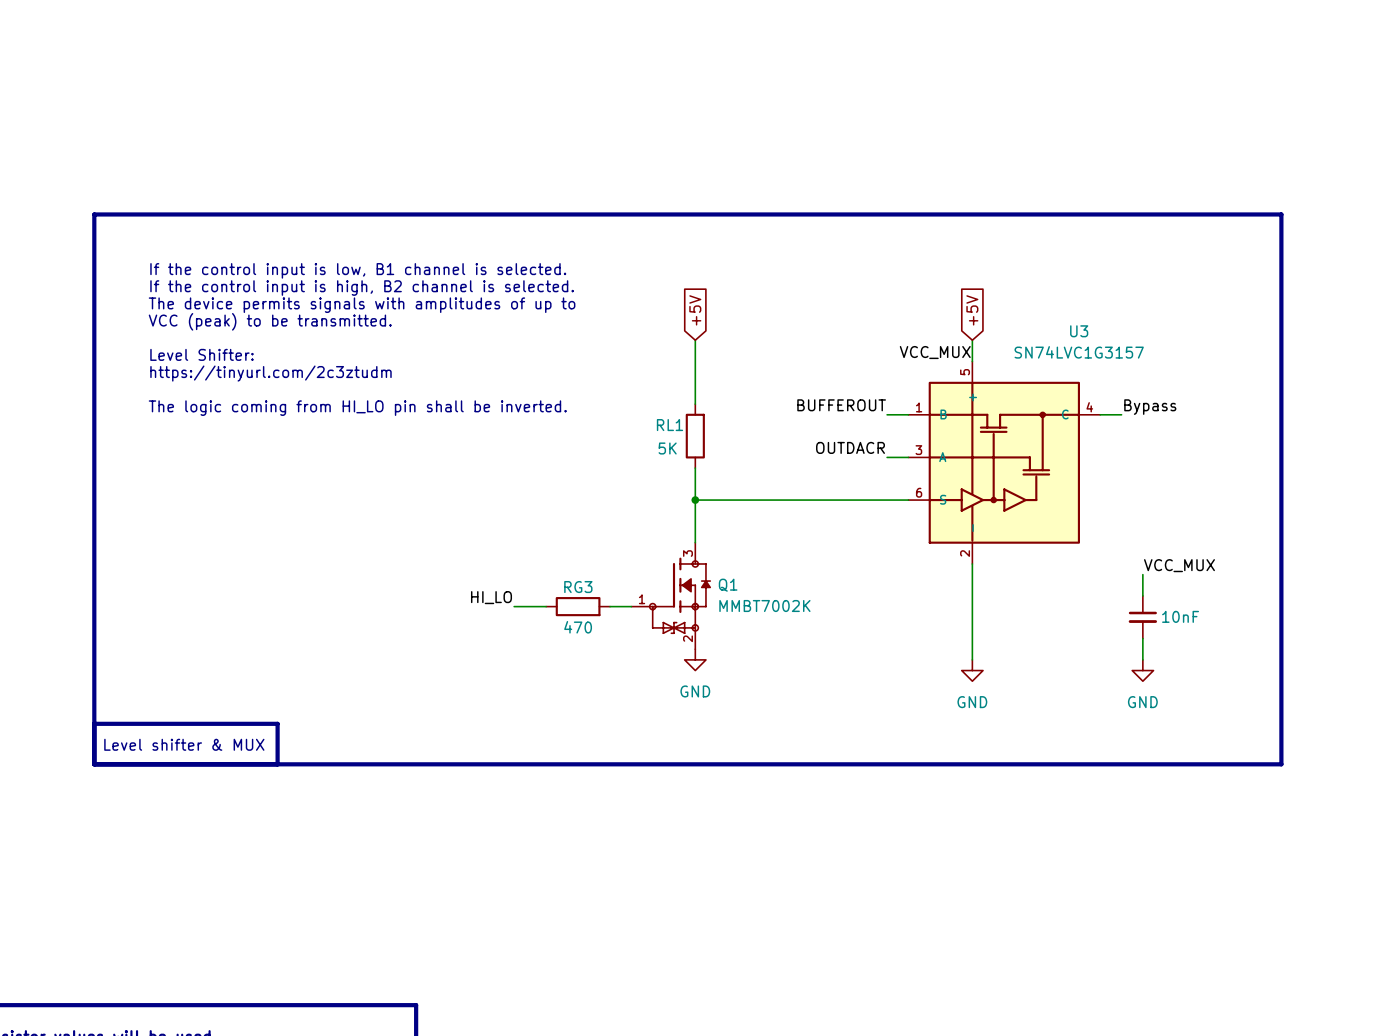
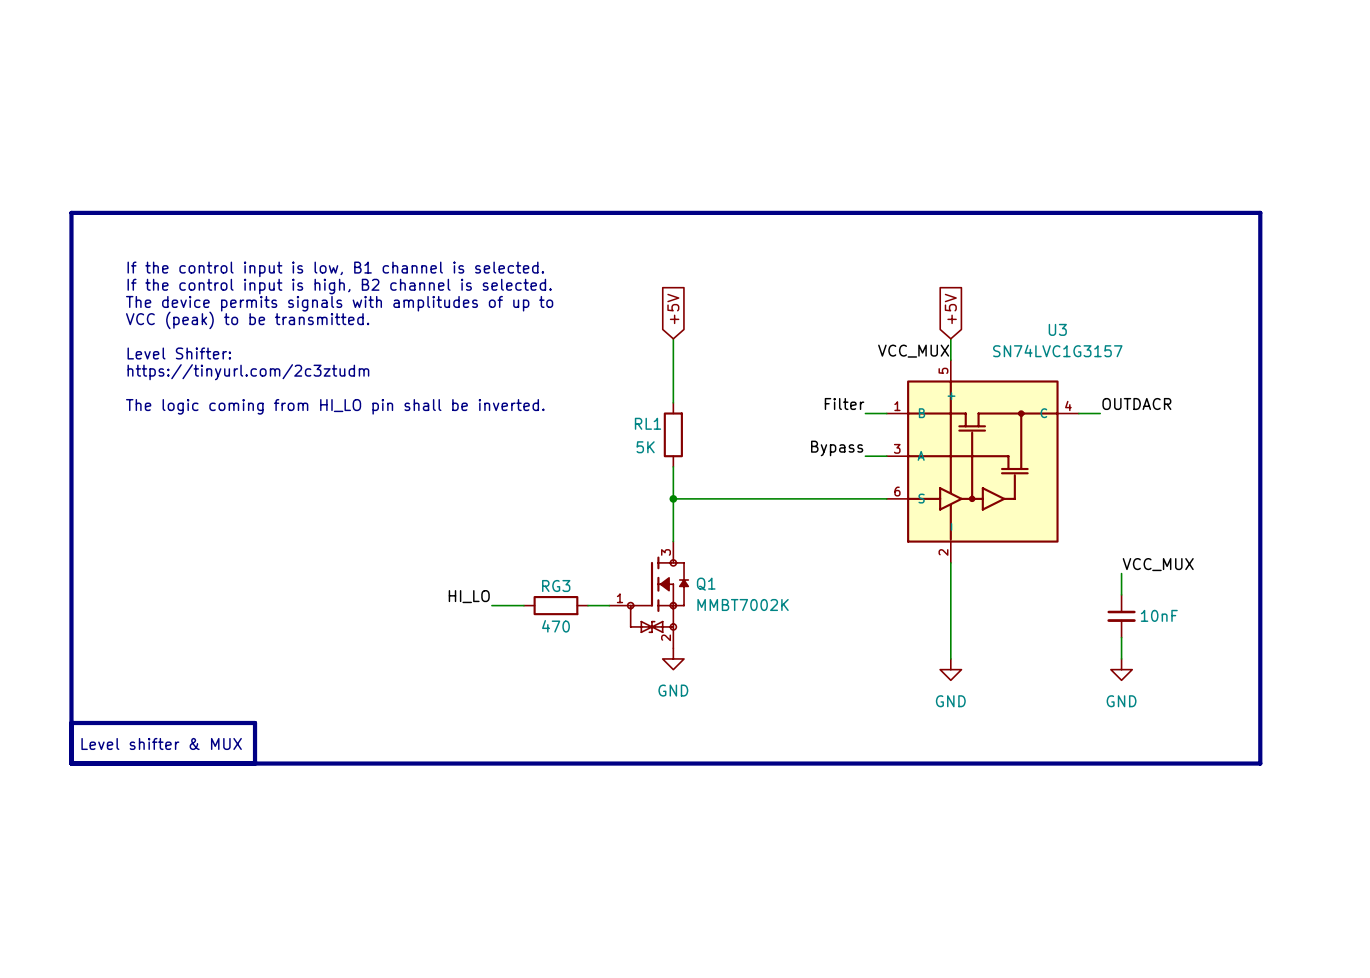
label: BUFFEROUT (841, 405) -> Filter (844, 403)
label: Bypass (1150, 407) -> OUTDACR (1136, 403)
label: OUTDACR (850, 447) -> Bypass (837, 448)

